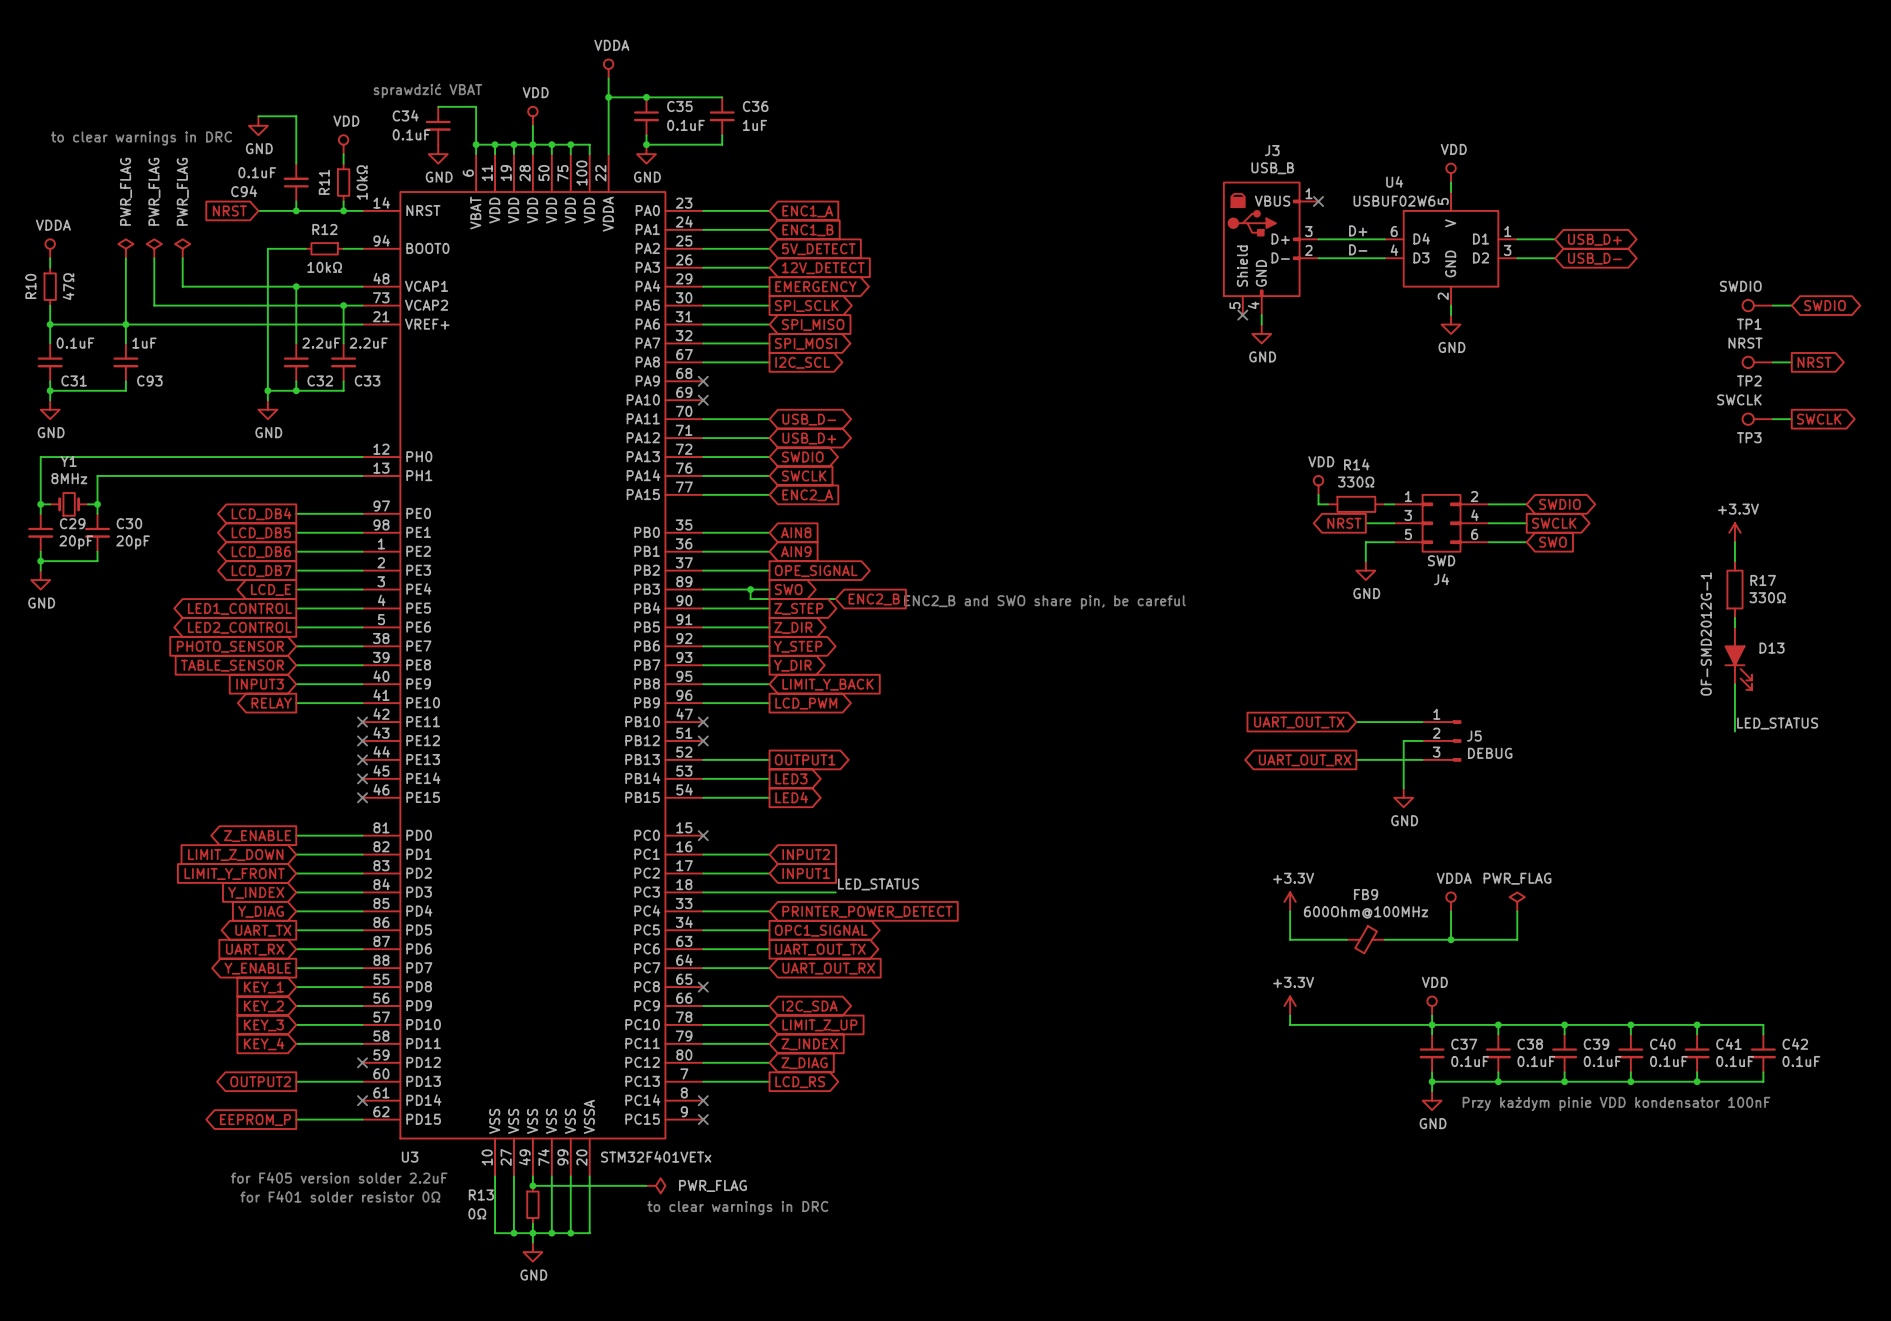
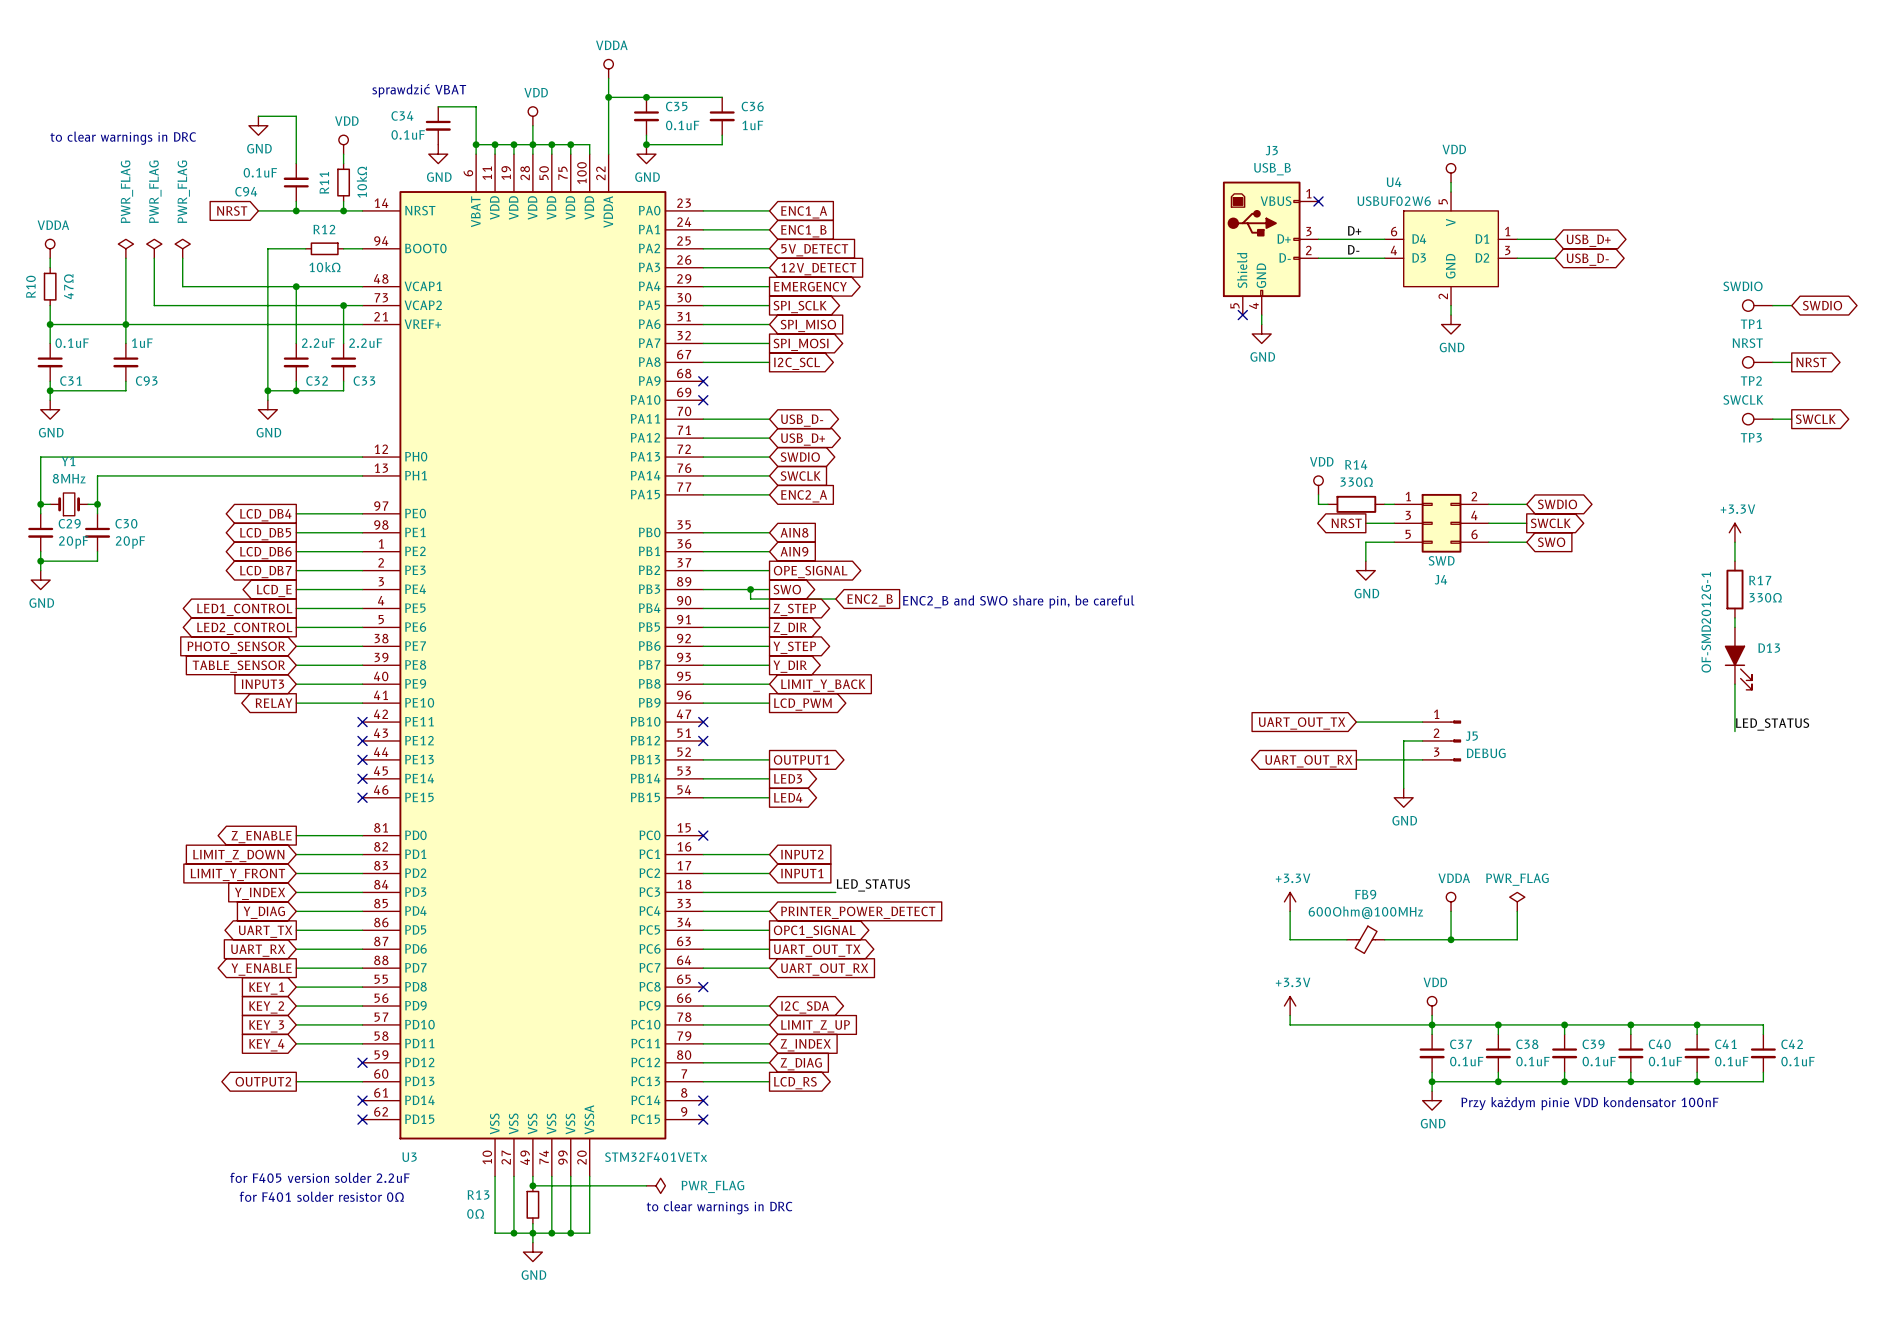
wire: (296, 1119) (362, 1119) -> none
no-connect mark: none -> (362, 1119)
global label: EEPROM_P (255, 1120) -> none

